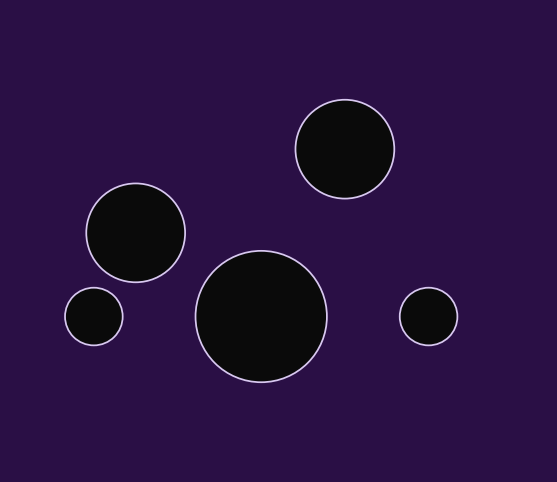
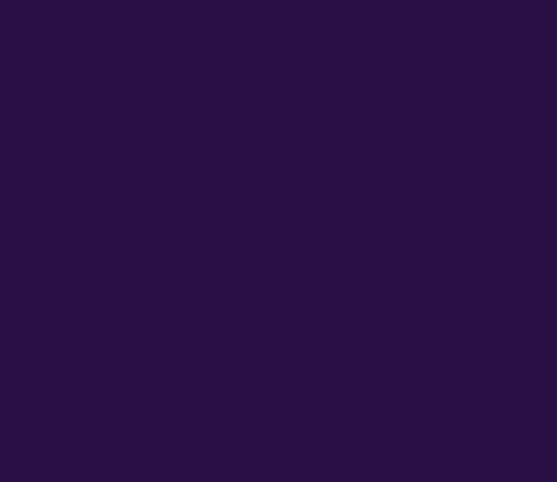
part: (261, 240) -> none

